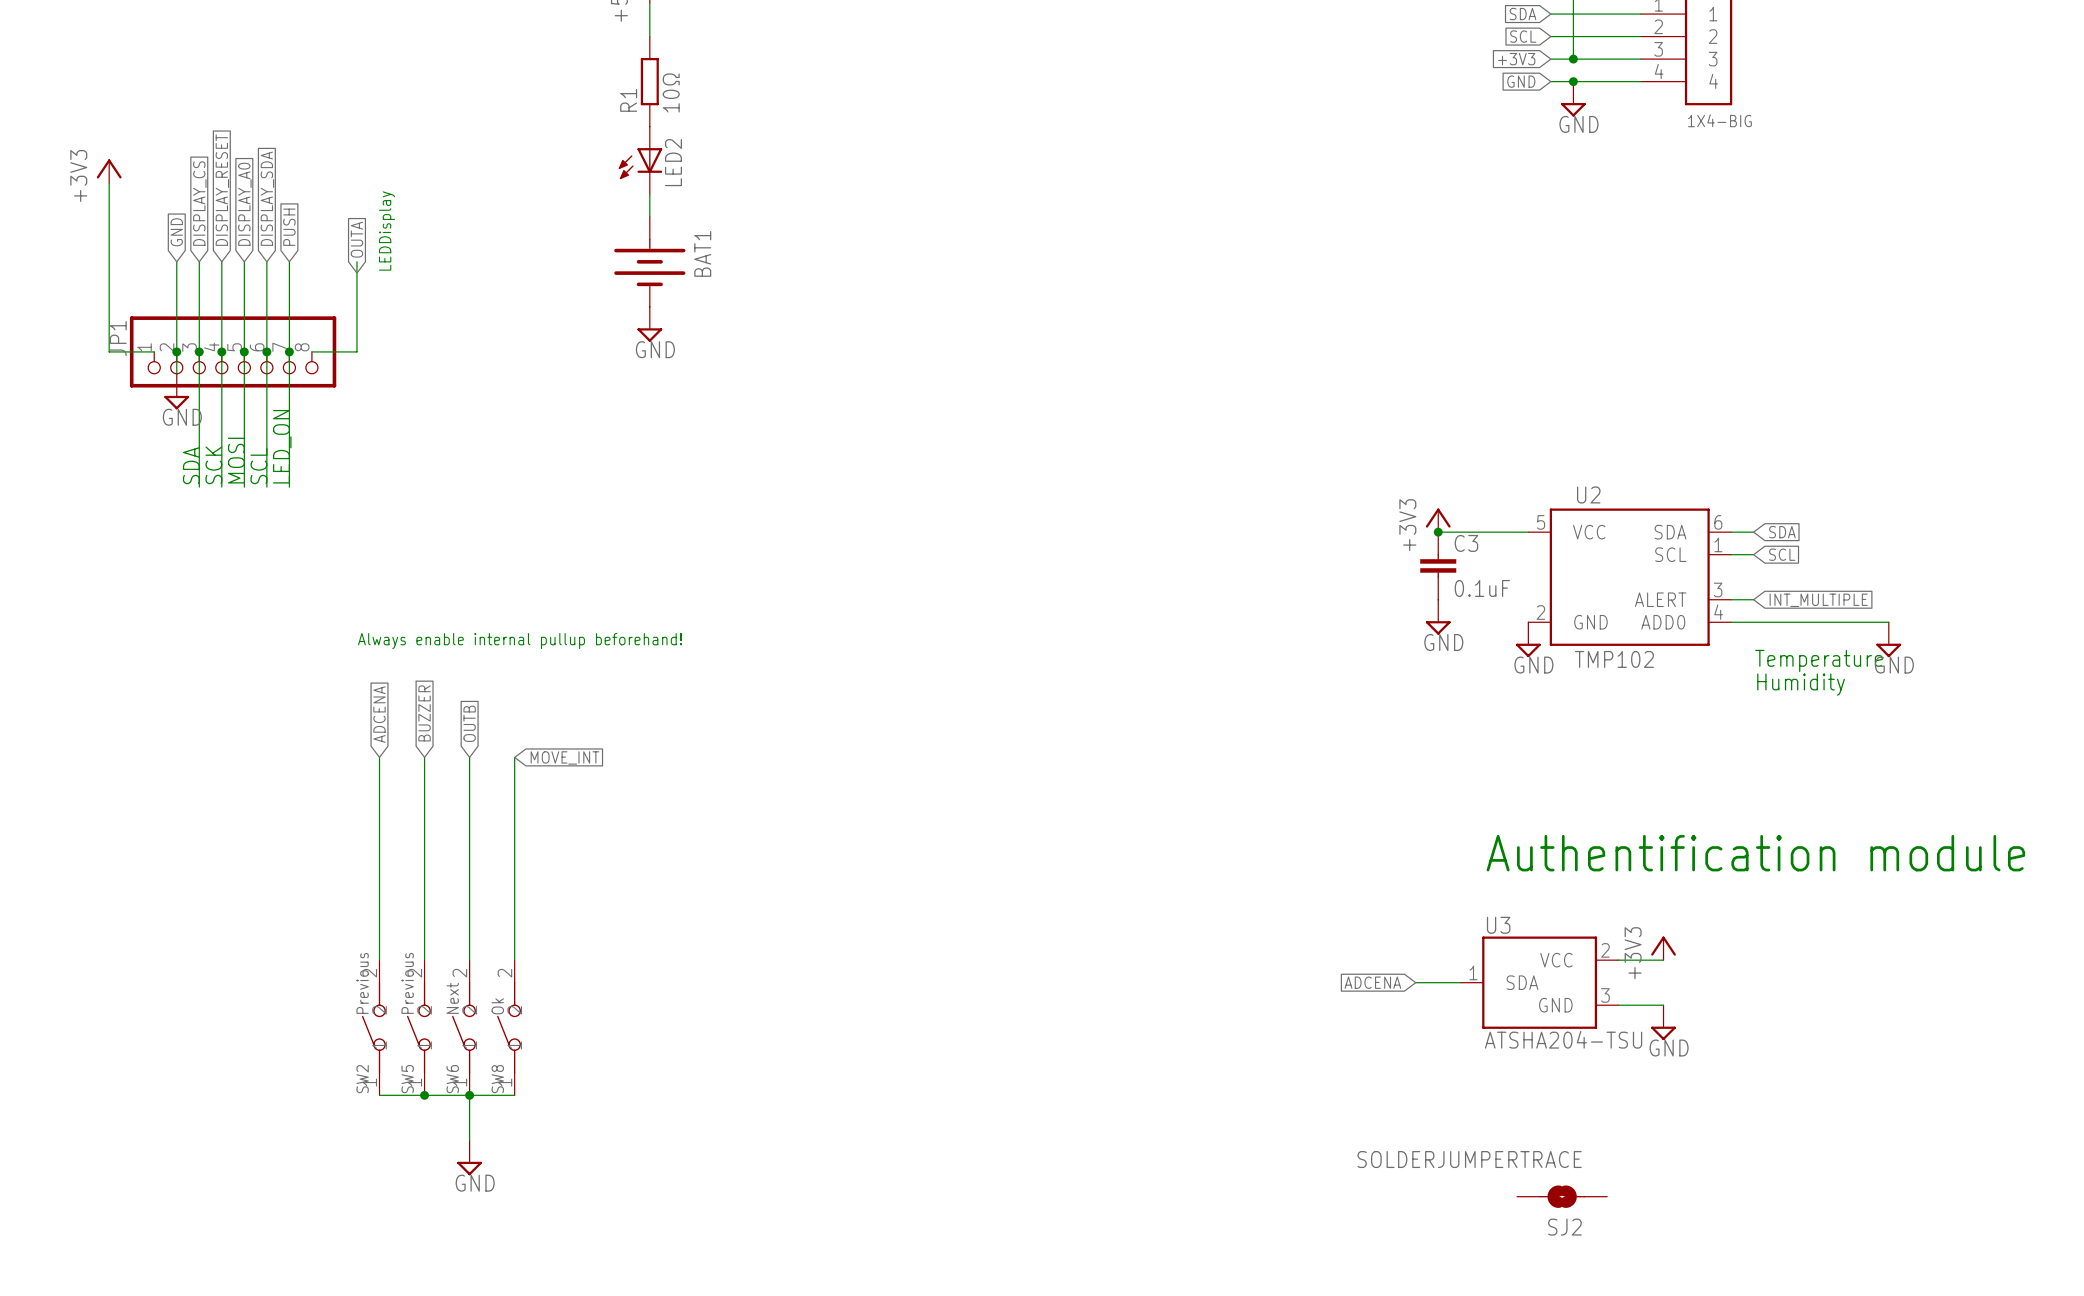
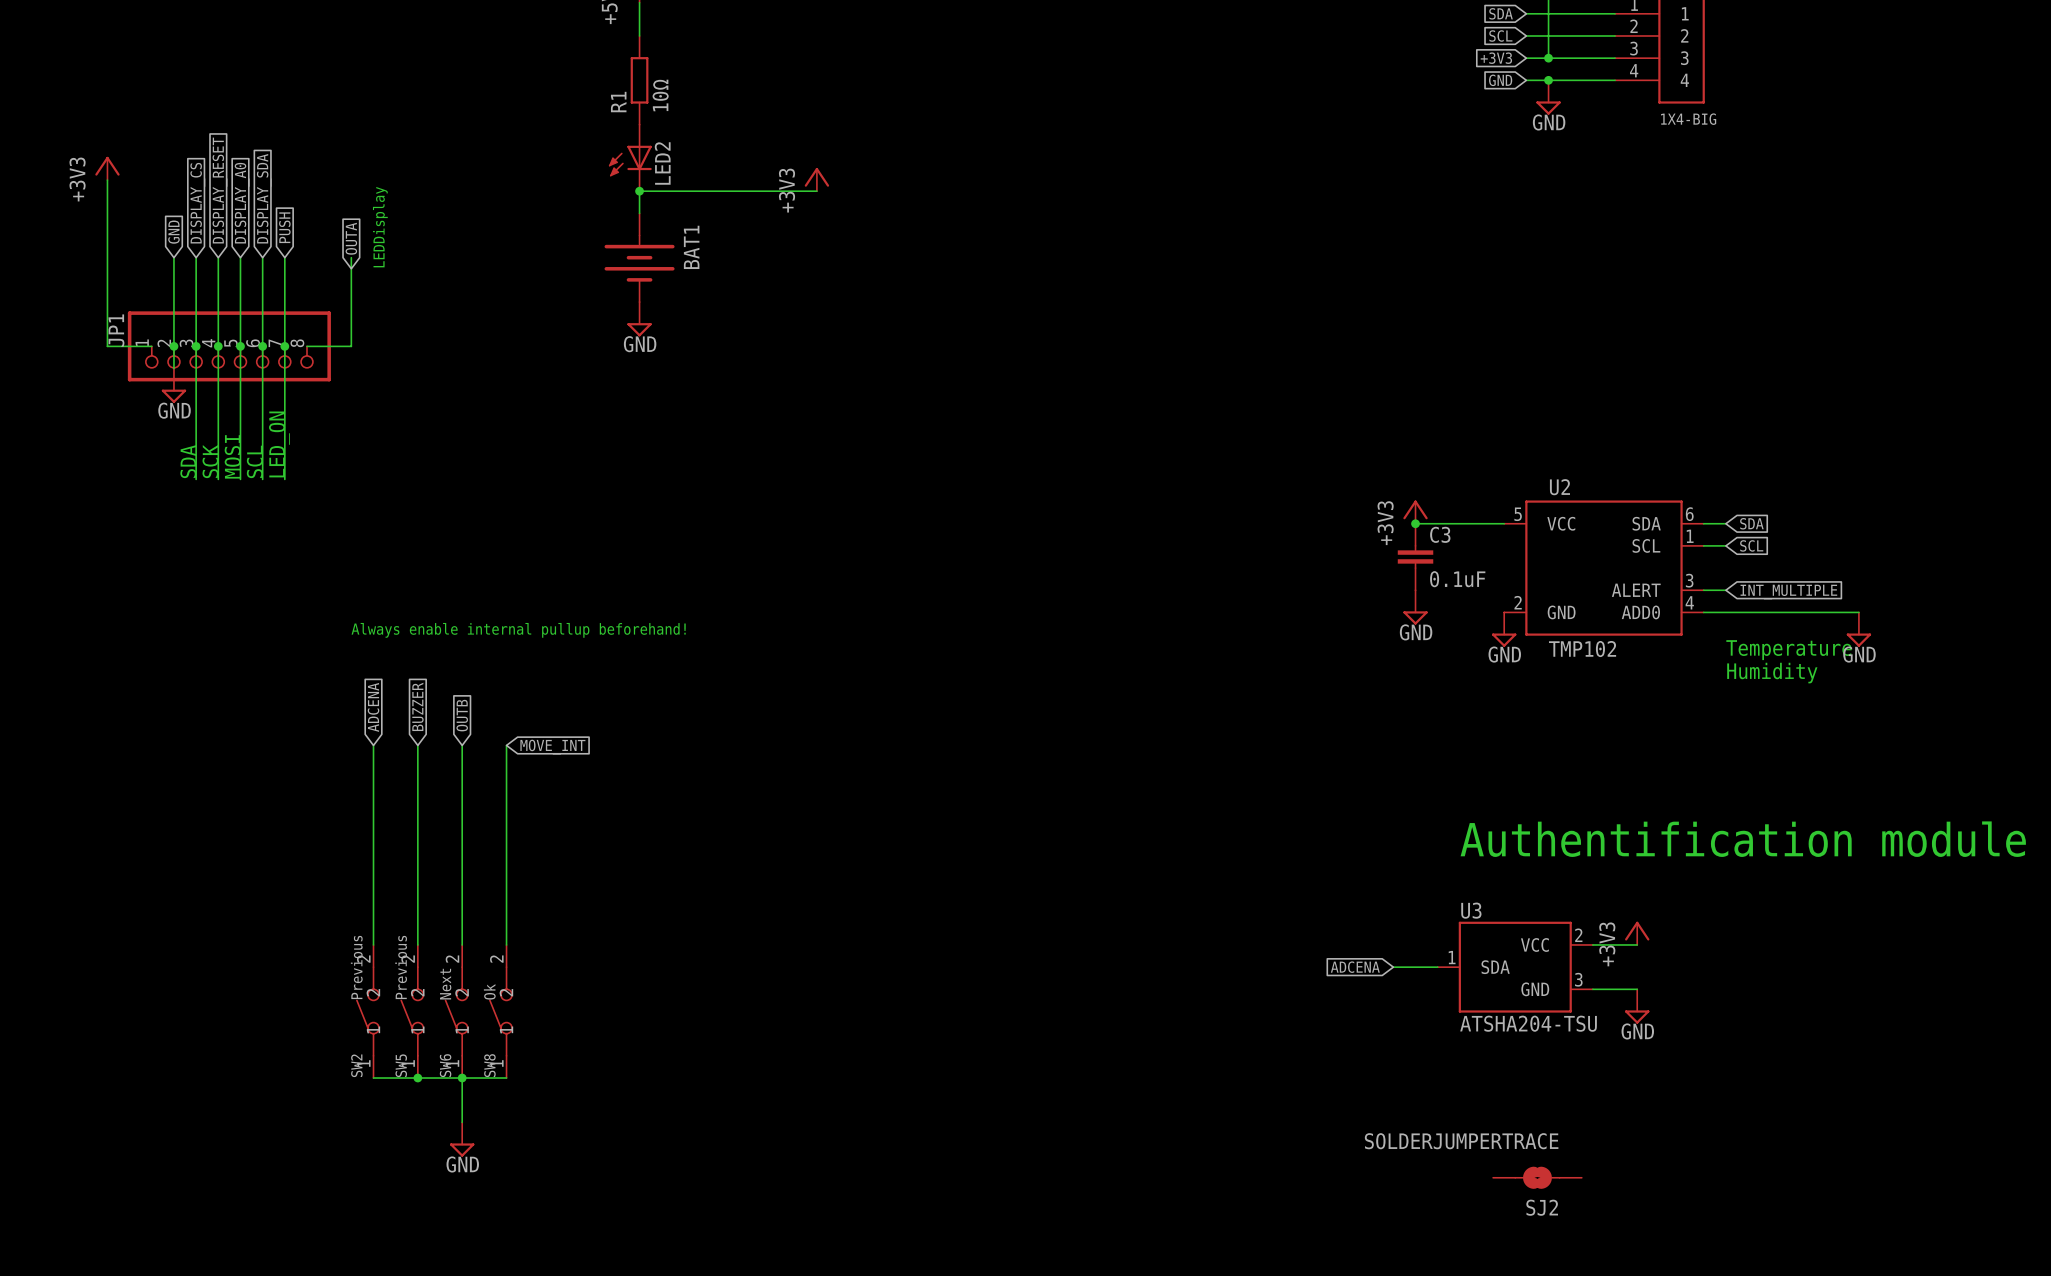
power symbol: none -> +3V3 (816, 179)
wire: none -> (639, 191) (816, 191)
junction: none -> (639, 191)

